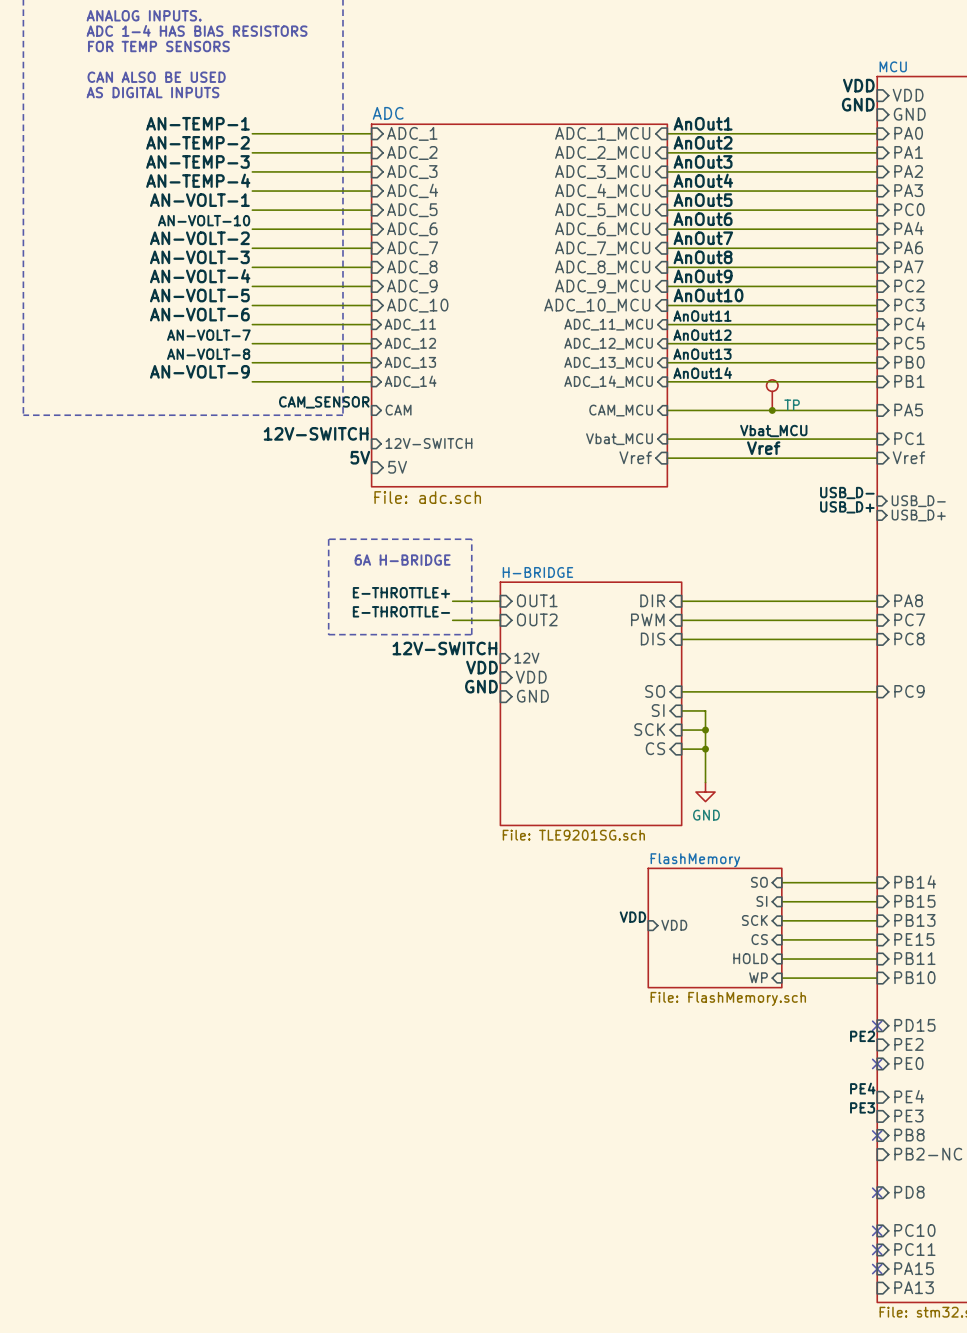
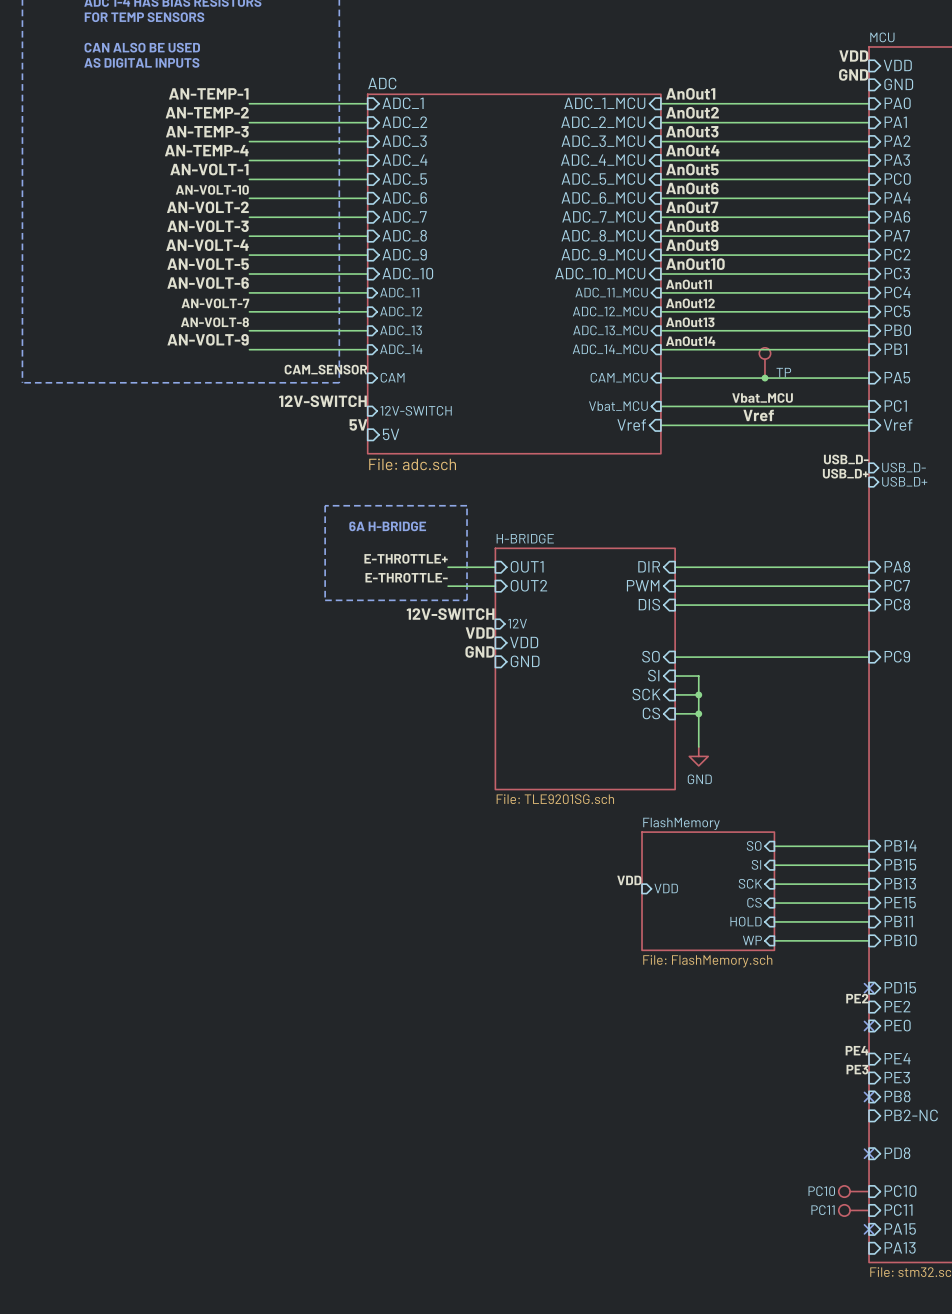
PC10: none -> (853, 1191)
no-connect mark: (877, 1230) -> none
PC11: none -> (853, 1210)
no-connect mark: (877, 1249) -> none

